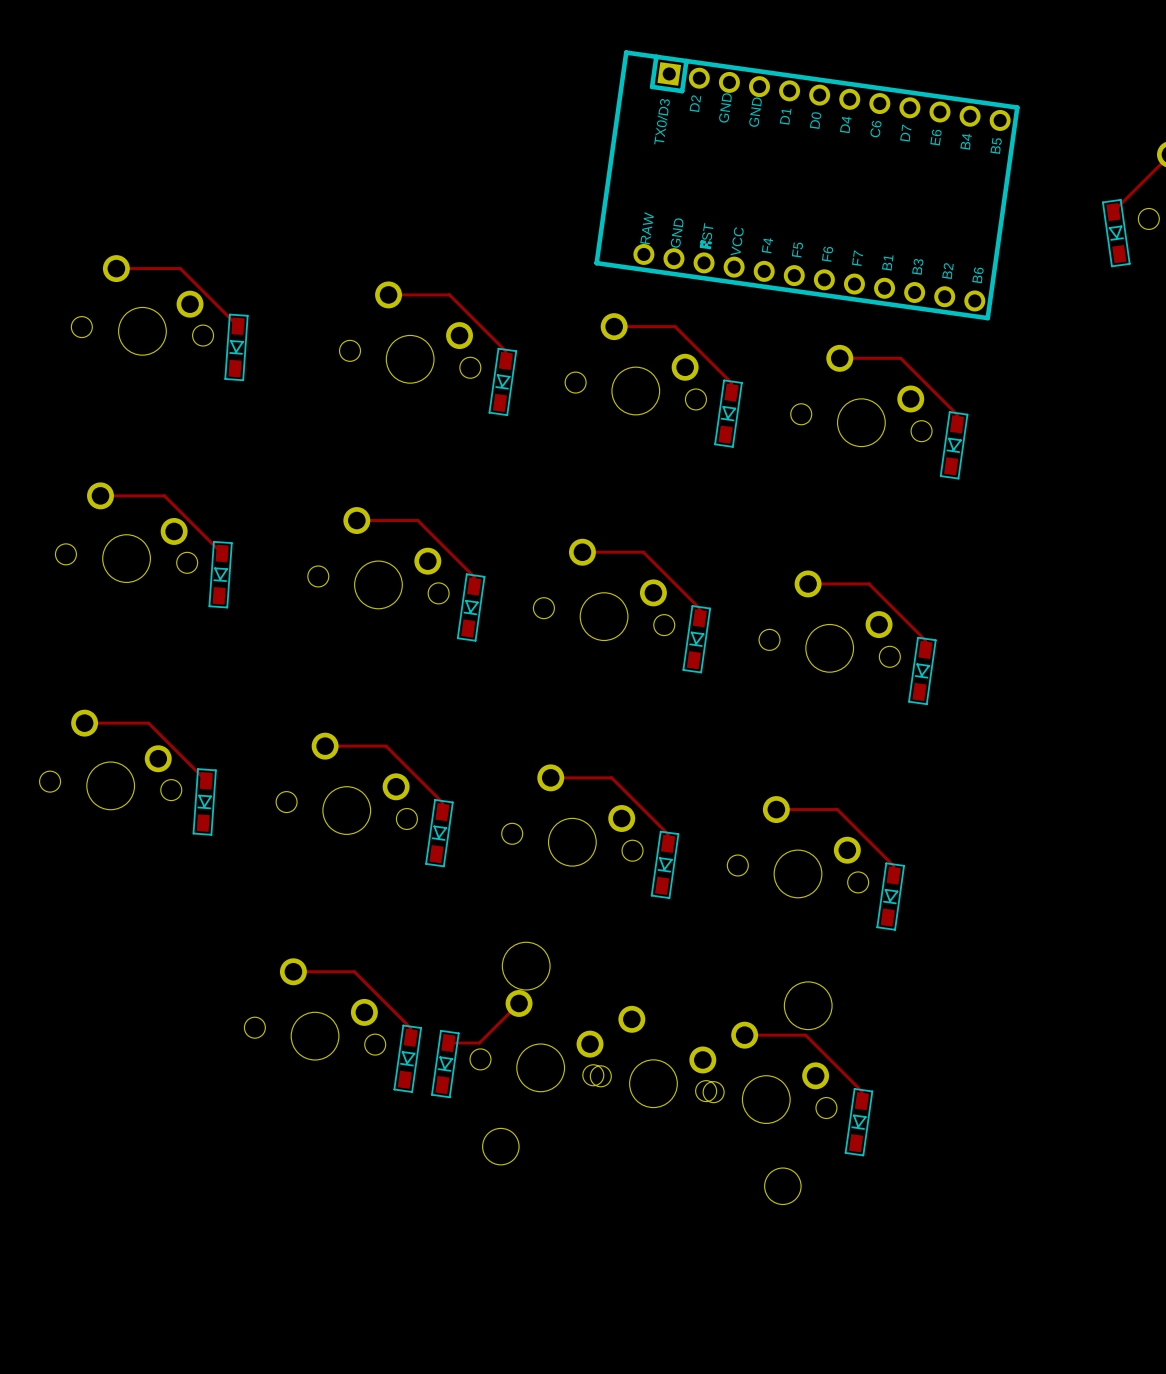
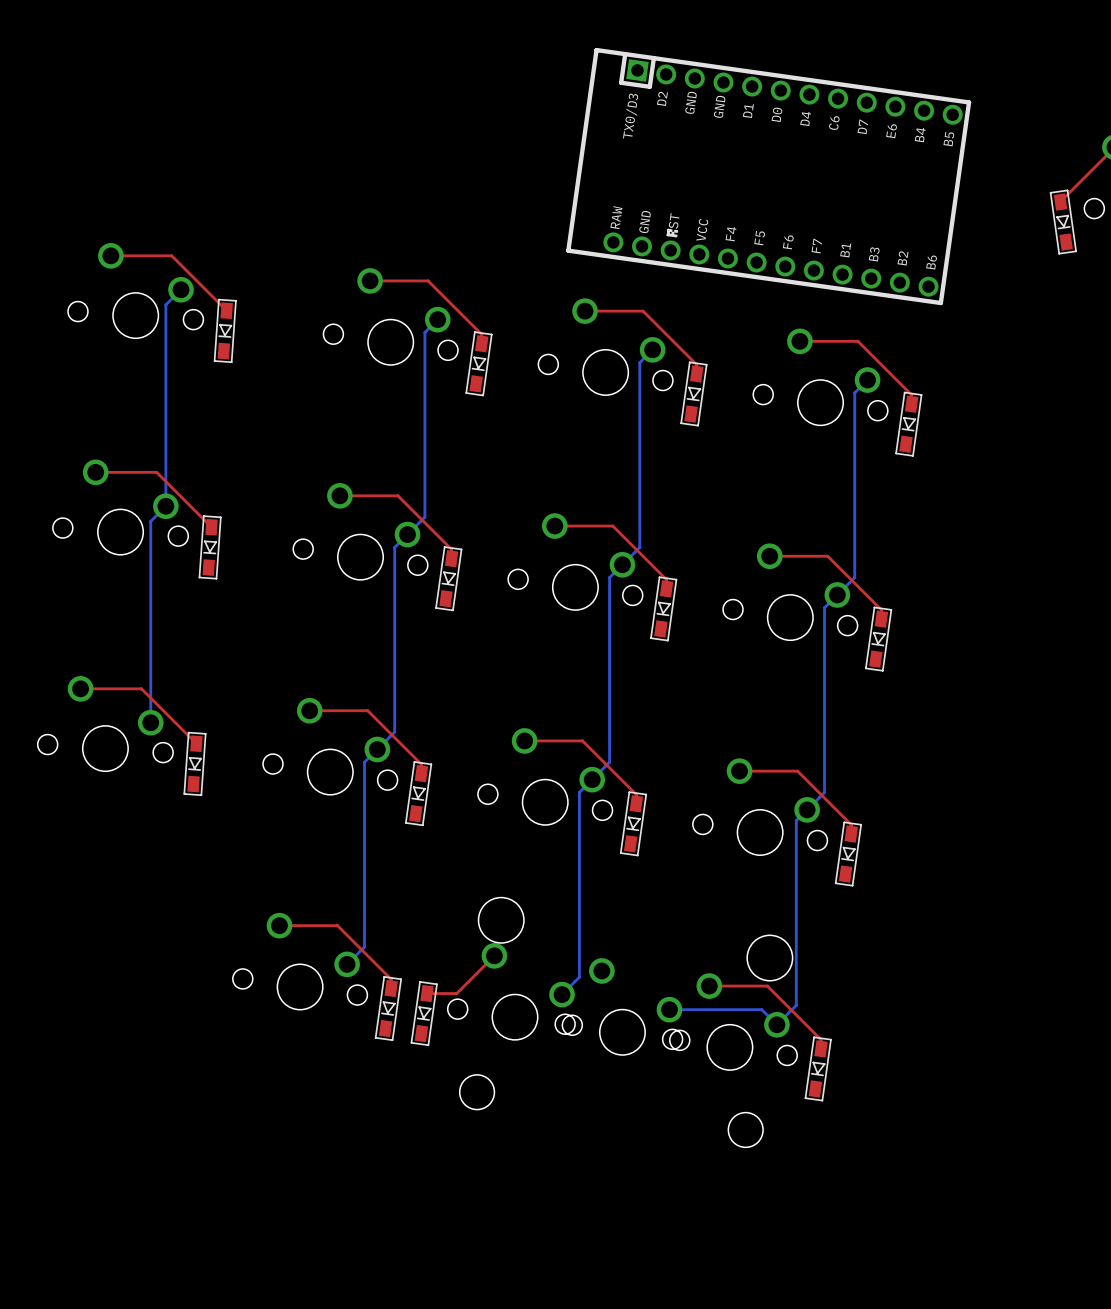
bottom track: none -> (181, 289) (165, 304) (165, 506) (150, 521) (150, 722)
bottom track: none -> (437, 319) (424, 332) (424, 517) (394, 547) (394, 732) (364, 762) (364, 946) (347, 964)
bottom track: none -> (652, 349) (639, 362) (639, 547) (609, 577) (609, 762) (579, 792) (579, 977) (562, 994)
bottom track: none -> (867, 380) (854, 392) (854, 577) (824, 607) (824, 792) (796, 820) (796, 1005) (776, 1024) (761, 1009) (669, 1009)

